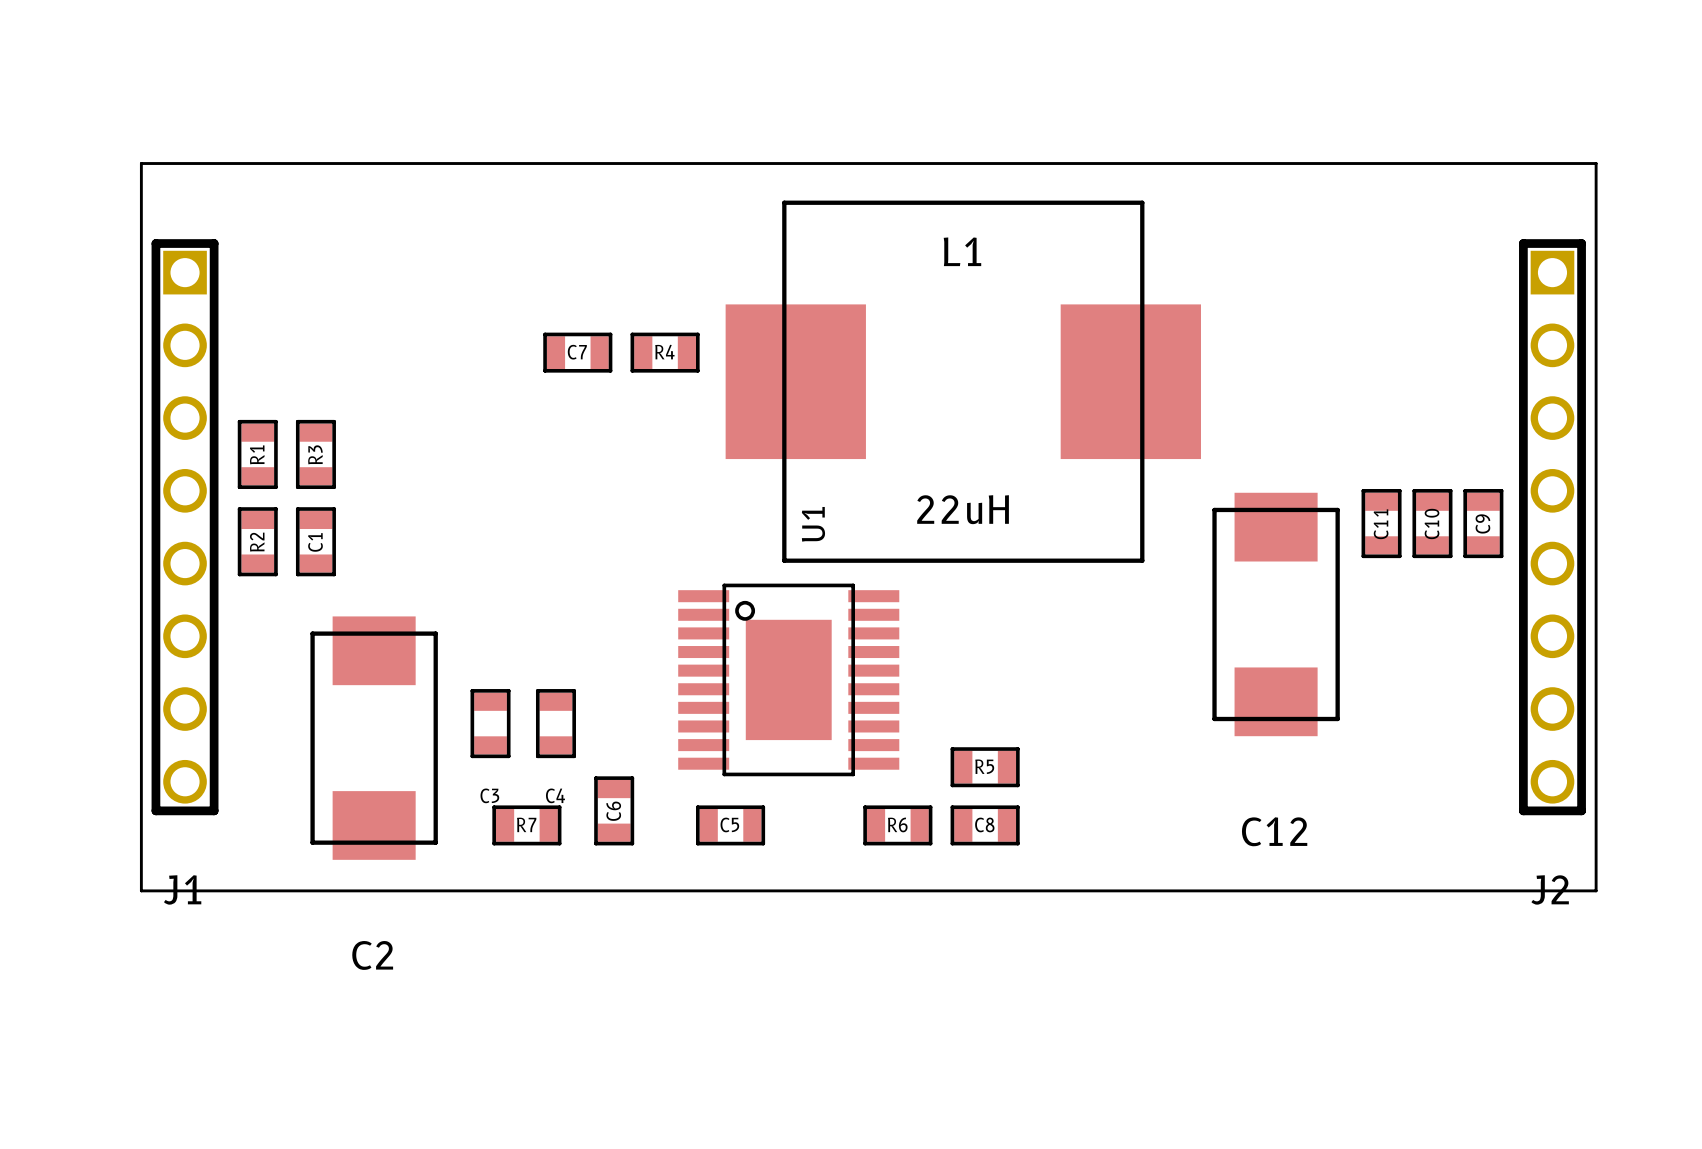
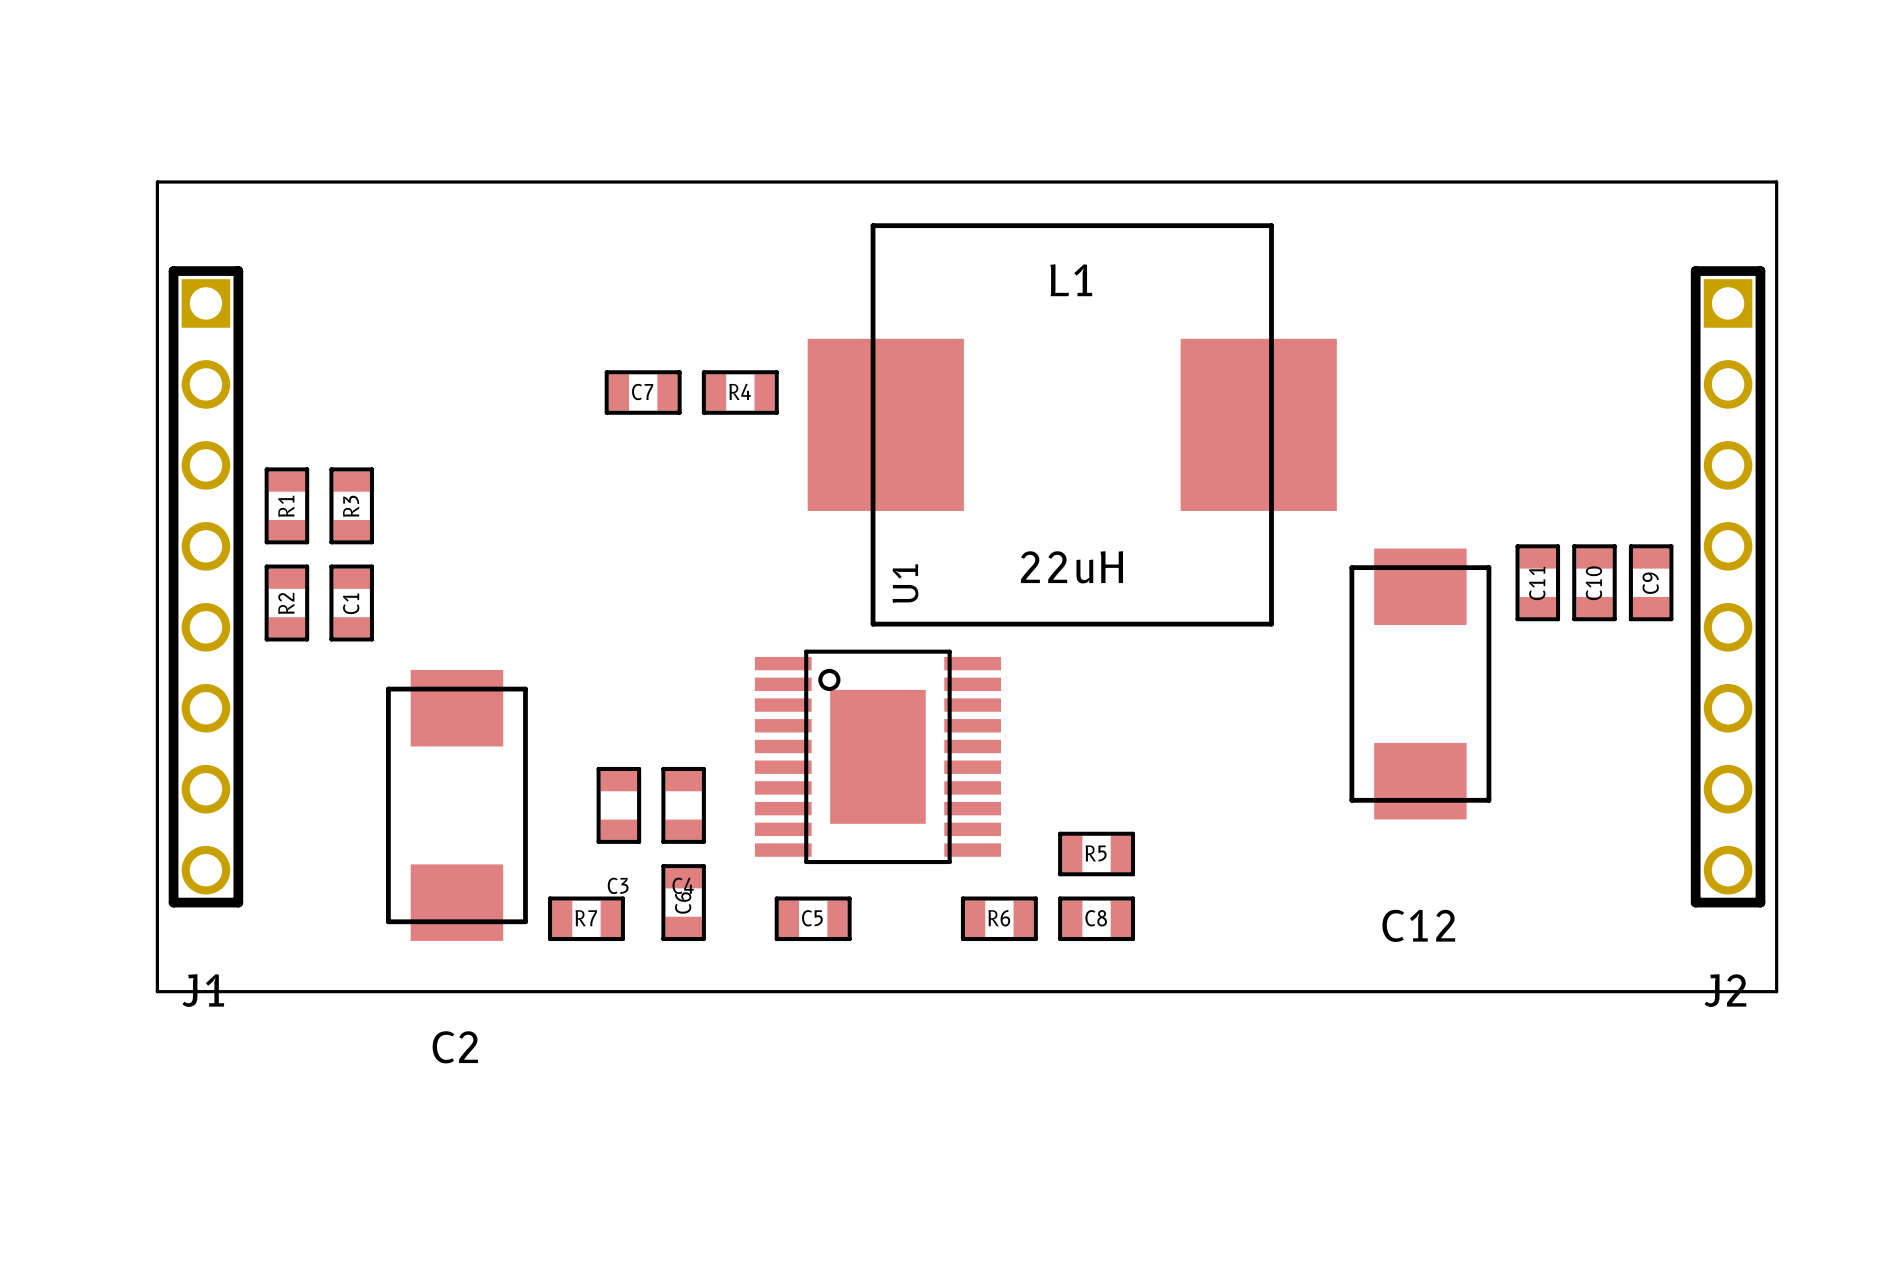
C3: (490, 723) -> none
C4: none -> (683, 805)
C2 position: (374, 738) -> (456, 805)
C4 name: C4 (555, 795) -> C3 (618, 885)

